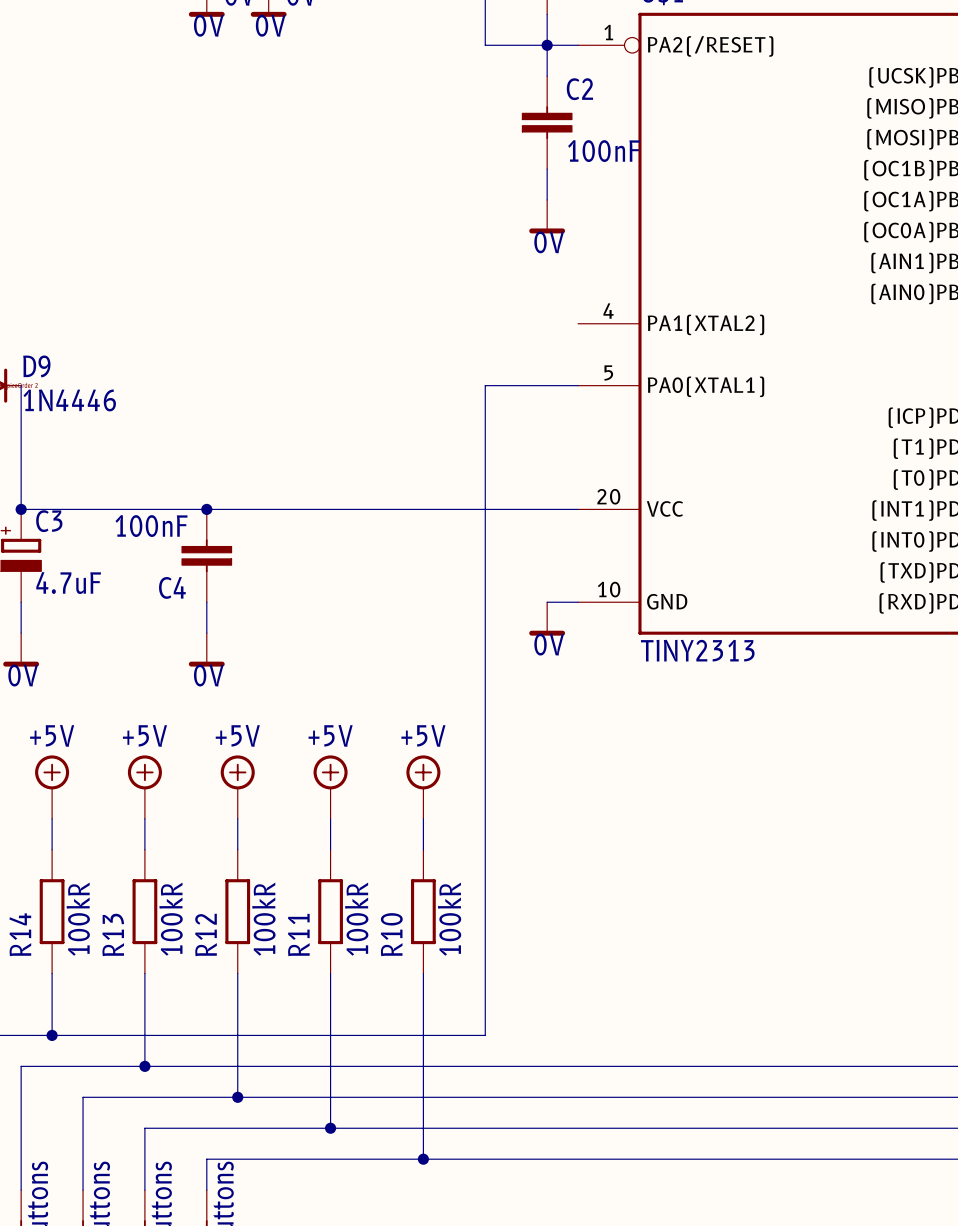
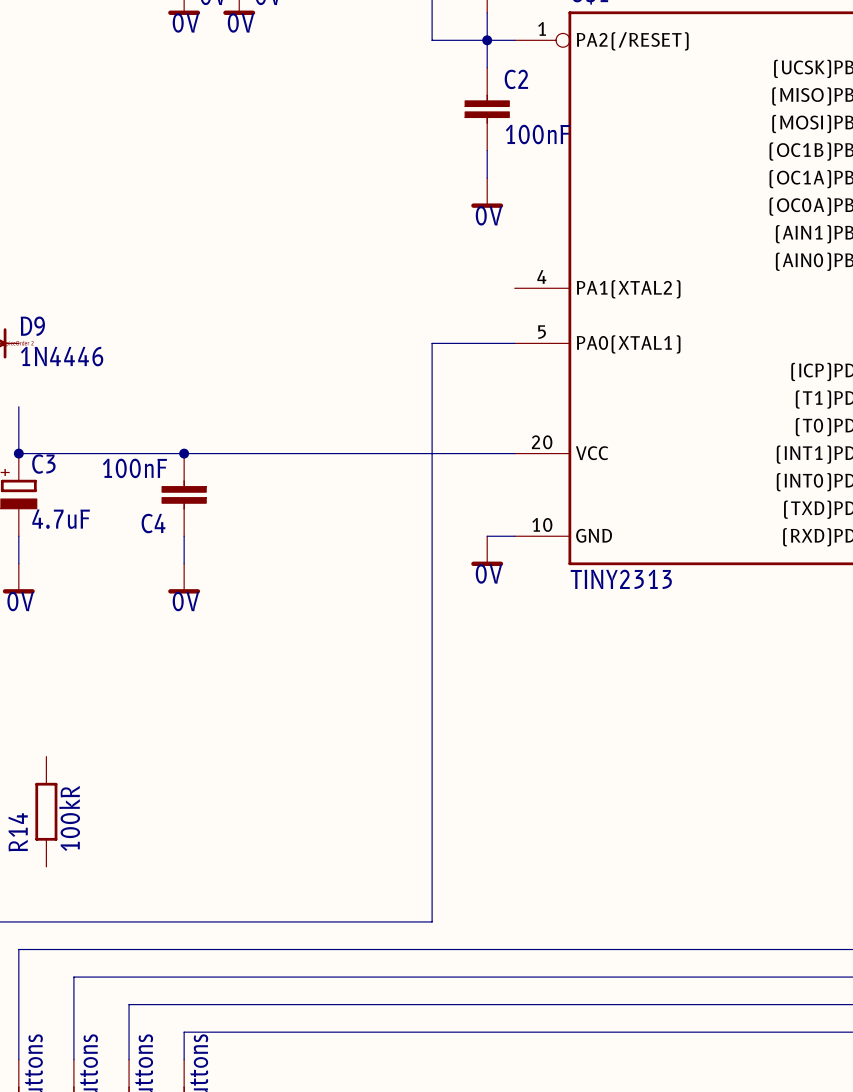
wire: (21, 385) (21, 456) -> none
power symbol: +5V (52, 787) -> none
power symbol: +5V (144, 787) -> none
power symbol: +5V (237, 787) -> none
power symbol: +5V (330, 787) -> none
power symbol: +5V (423, 787) -> none
wire: (52, 818) (52, 849) -> none
wire: (144, 818) (144, 849) -> none
wire: (237, 818) (237, 849) -> none
wire: (330, 818) (330, 849) -> none
wire: (423, 818) (423, 849) -> none
R13: 100kR (144, 911) -> none
R12: 100kR (237, 911) -> none
R11: 100kR (330, 911) -> none
R10: 100kR (423, 911) -> none
wire: (52, 973) (52, 1035) -> none
wire: (144, 973) (144, 1066) -> none
wire: (237, 973) (237, 1097) -> none
wire: (330, 973) (330, 1128) -> none
wire: (423, 973) (423, 1159) -> none
junction: (52, 1035) -> none
junction: (144, 1066) -> none
junction: (237, 1097) -> none
junction: (330, 1128) -> none
junction: (423, 1159) -> none

